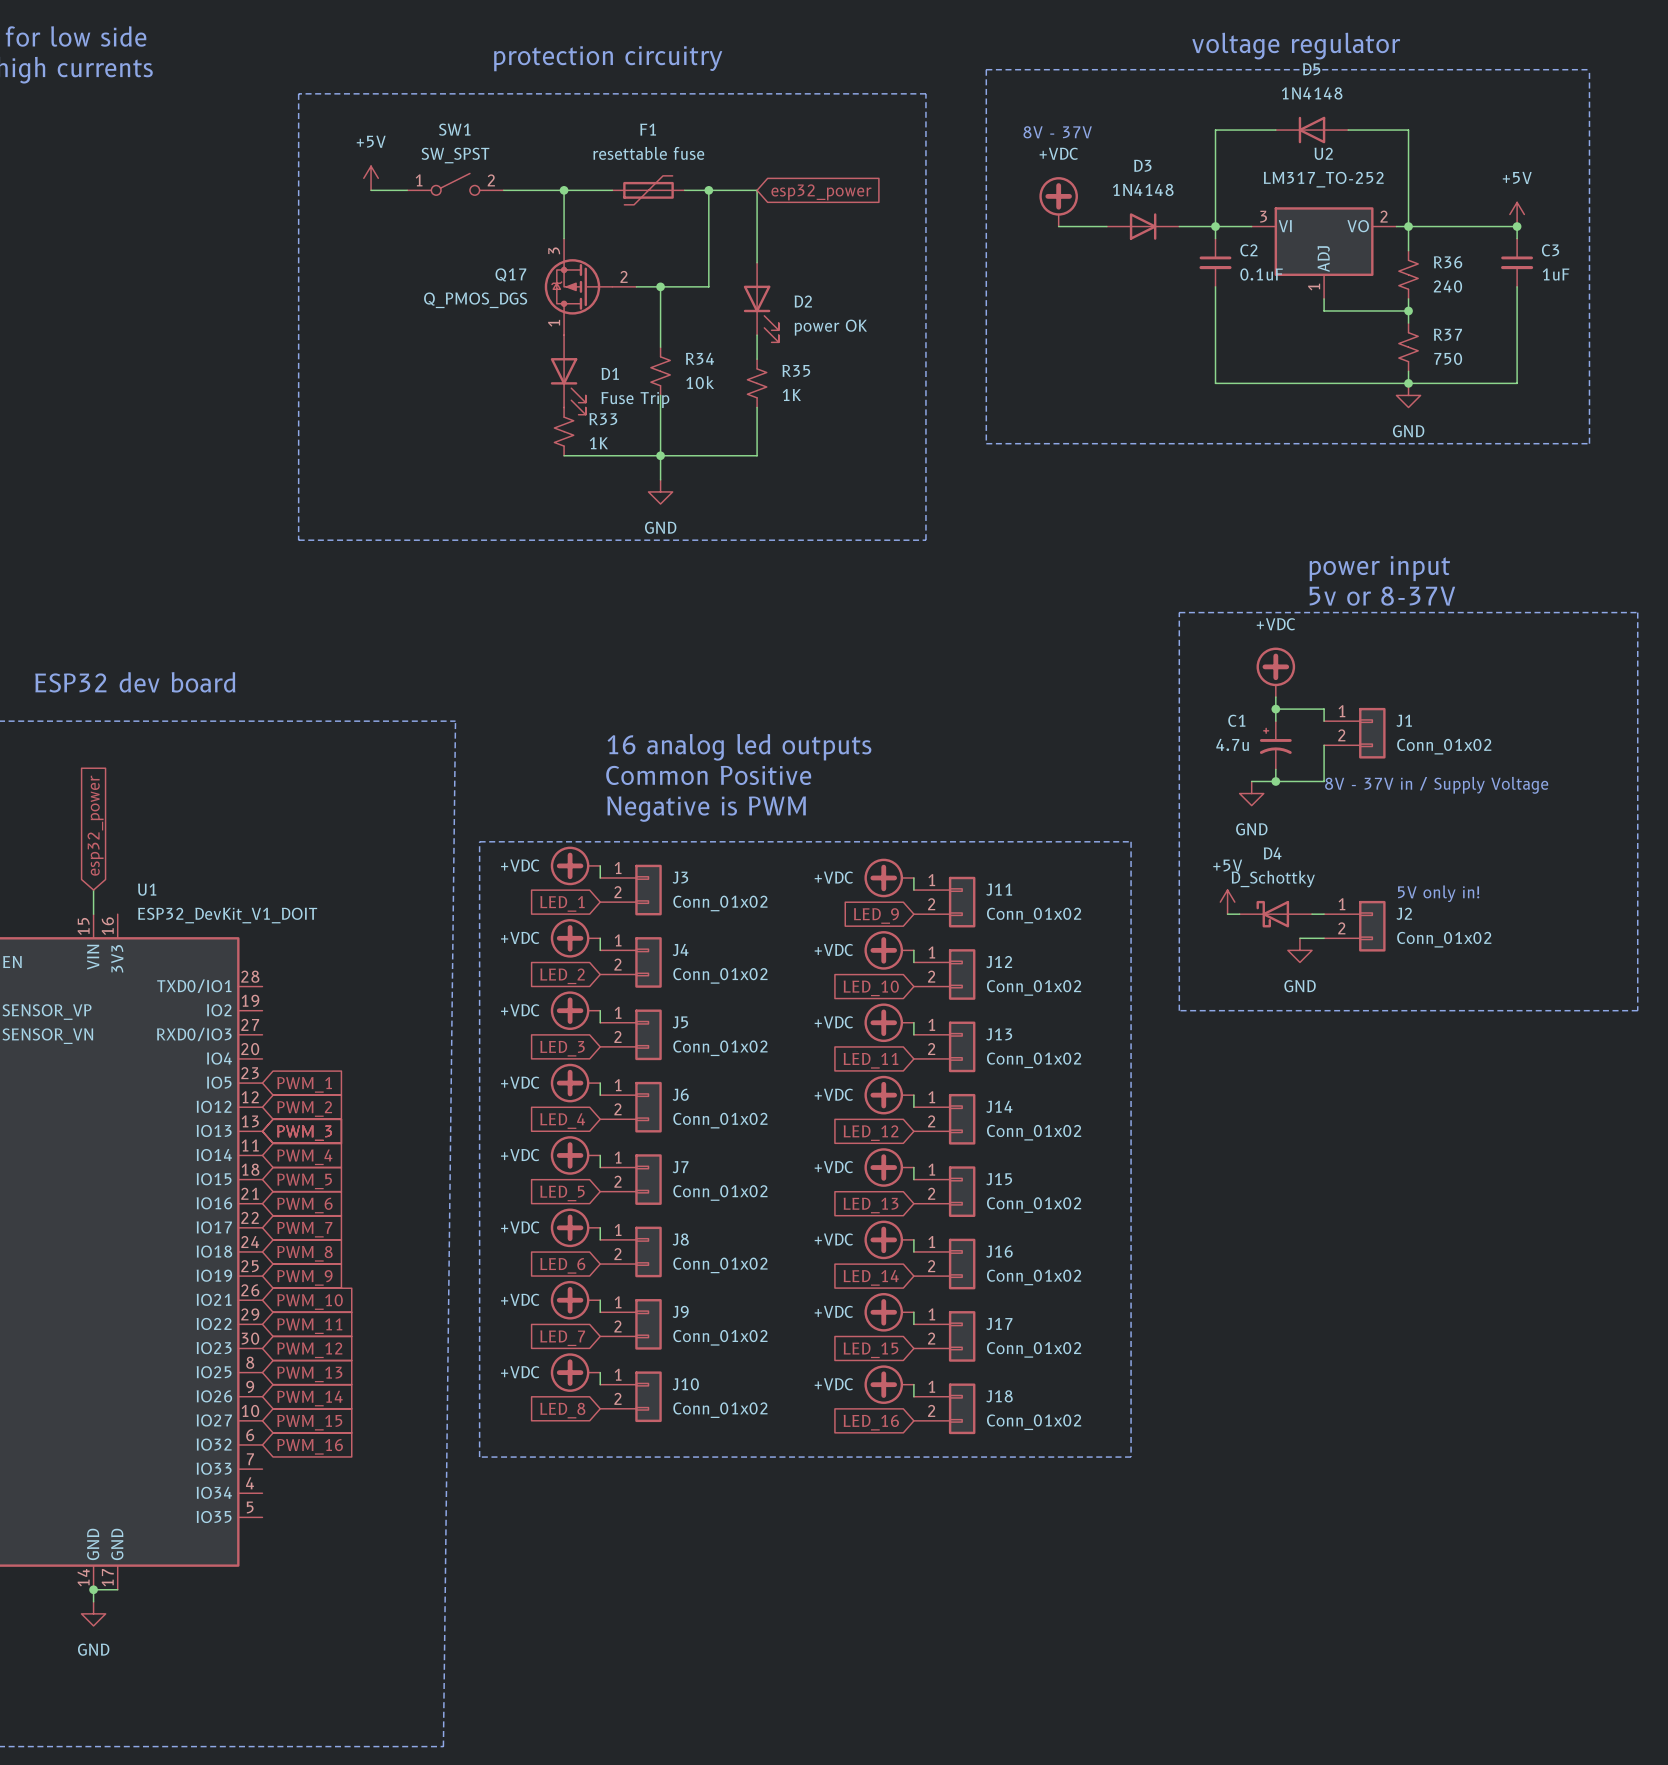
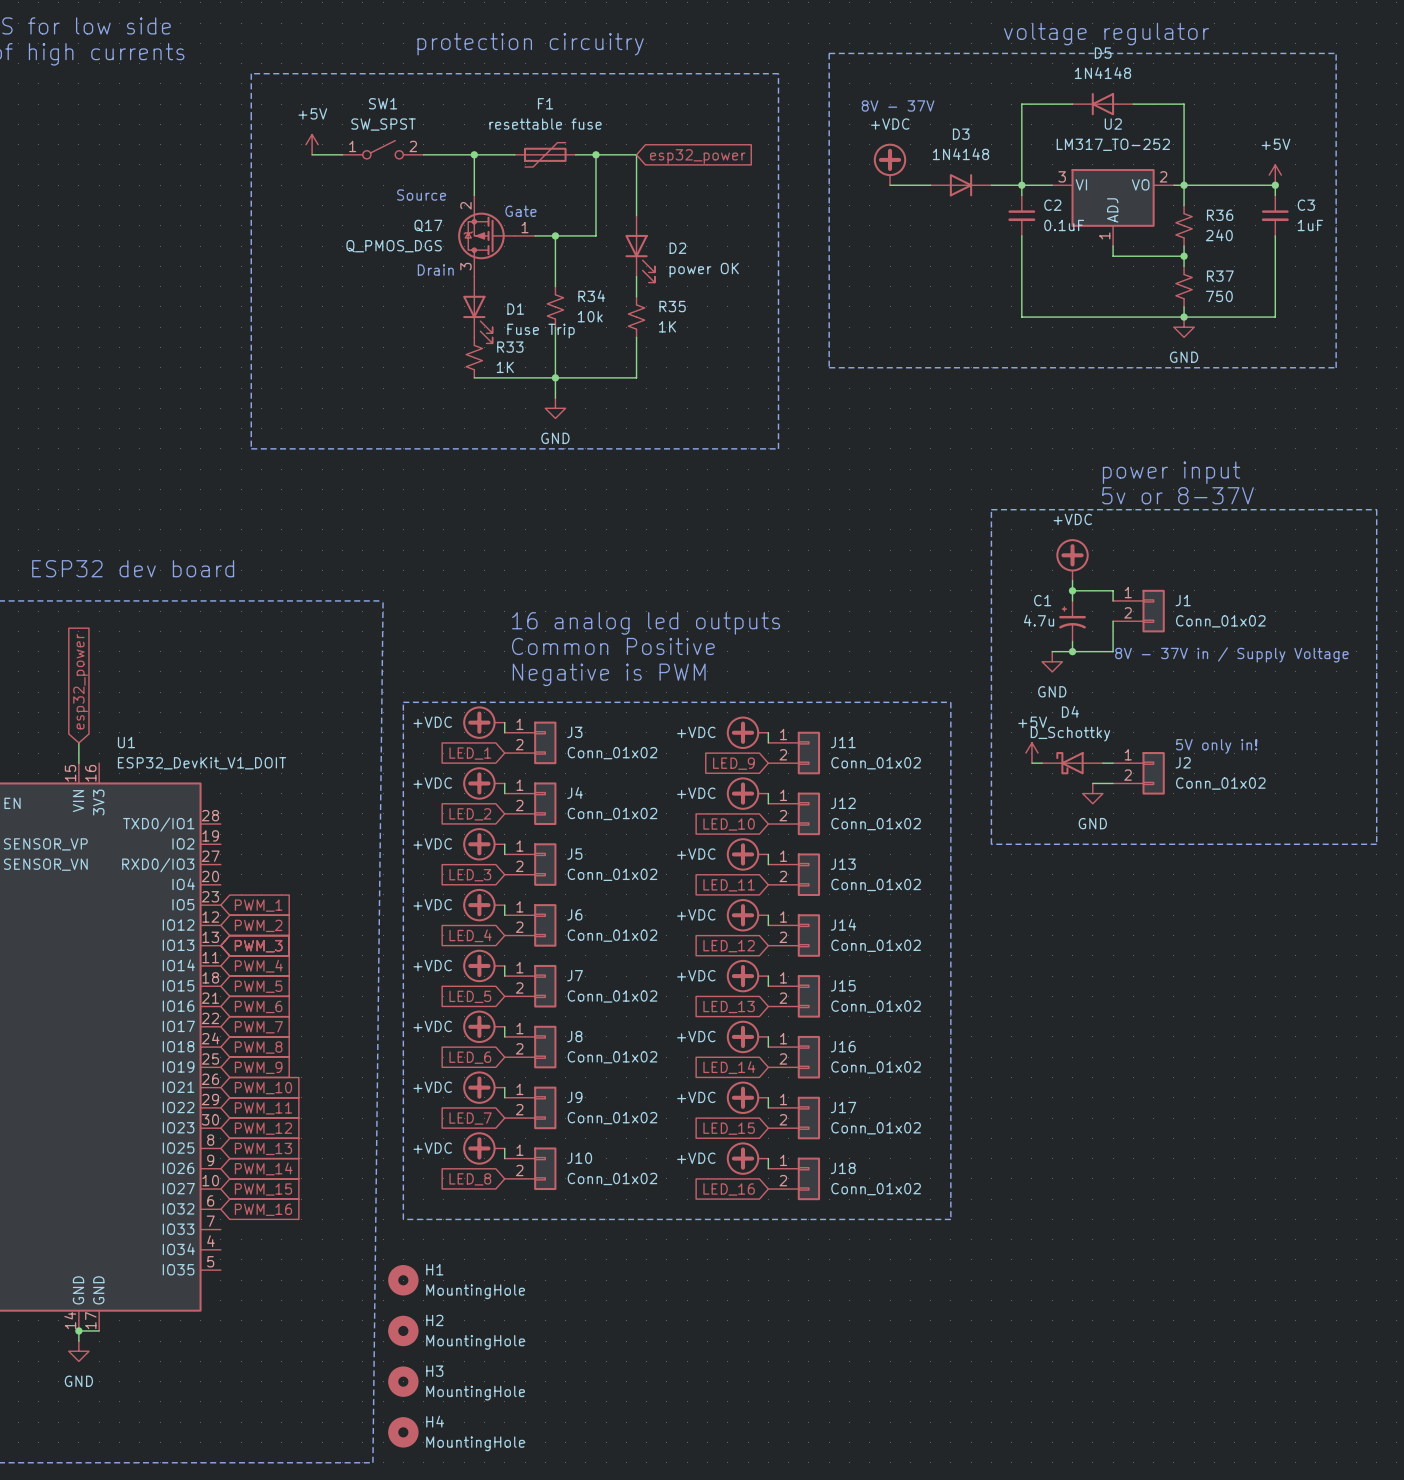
text: none -> Source (421, 195)
Q17 pin number: 3 (554, 250) -> 2 (465, 205)
text: none -> Gate (520, 211)
Q17 pin number: 2 (624, 276) -> 1 (525, 227)
Q17 pin number: 1 (554, 323) -> 3 (465, 266)
text: none -> Drain (435, 270)
H1: none -> MountingHole (403, 1280)
H2: none -> MountingHole (403, 1330)
H3: none -> MountingHole (403, 1381)
H4: none -> MountingHole (403, 1432)

